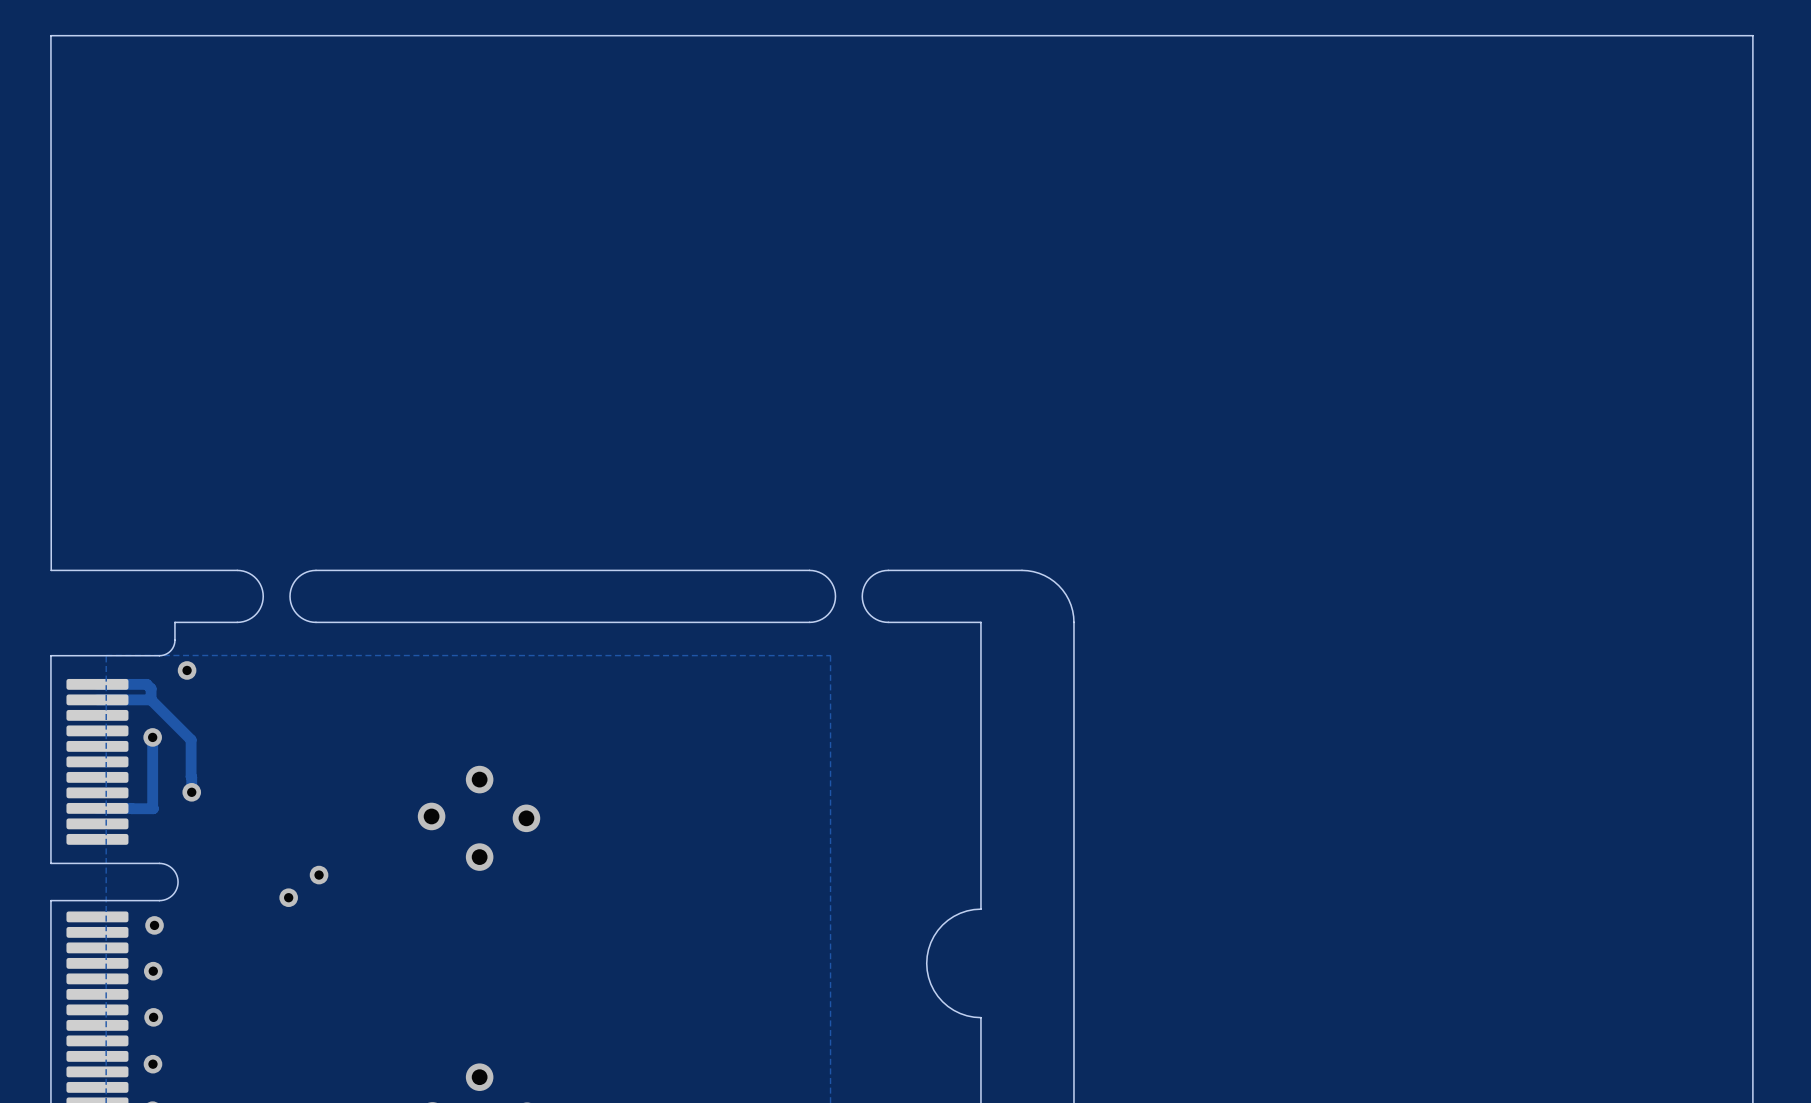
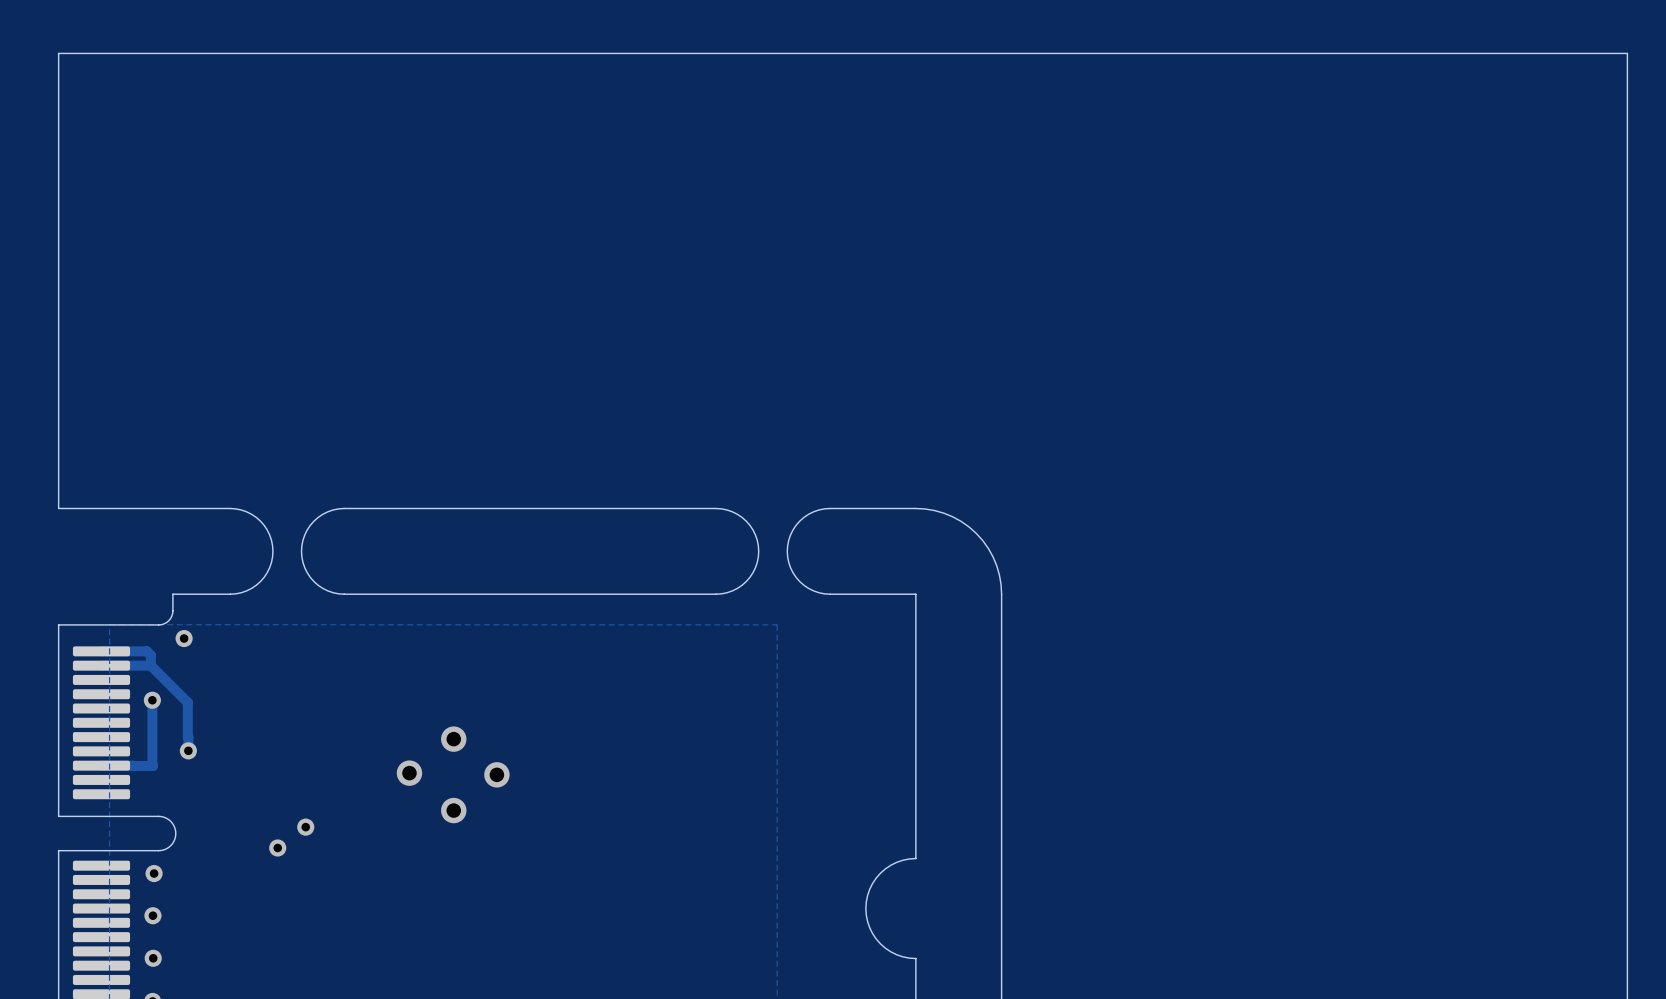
board edge: (50, 35) (51, 570) (243, 571) (252, 575) (258, 581) (262, 590) (263, 599) (260, 608) (254, 615) (246, 620) (237, 622) -> (58, 53) (58, 508) (230, 508) (251, 514) (264, 525) (269, 534) (272, 551) (271, 562) (264, 577) (256, 585) (241, 592) (230, 594)
board edge: (764, 622) (809, 622) (822, 618) (830, 612) (834, 603) (835, 593) (832, 583) (822, 573) (809, 570) (315, 570) (301, 575) (292, 584) (290, 593) (291, 605) (296, 613) (303, 619) (315, 622) (360, 622) -> (716, 594) (732, 590) (742, 585) (753, 572) (758, 556) (757, 540) (749, 525) (741, 517) (726, 509) (344, 508) (327, 511) (313, 521) (304, 535) (301, 551) (304, 567) (314, 581) (328, 590) (344, 594)
board edge: (1073, 622) (1068, 599) (1058, 585) (1039, 573) (1022, 570) (888, 570) (879, 572) (871, 576) (865, 584) (862, 599) (865, 608) (871, 615) (879, 620) (888, 622) -> (1001, 594) (996, 565) (988, 548) (976, 533) (952, 516) (924, 508) (829, 508) (813, 511) (799, 521) (790, 535) (787, 551) (790, 567) (799, 581) (813, 590) (830, 594)

